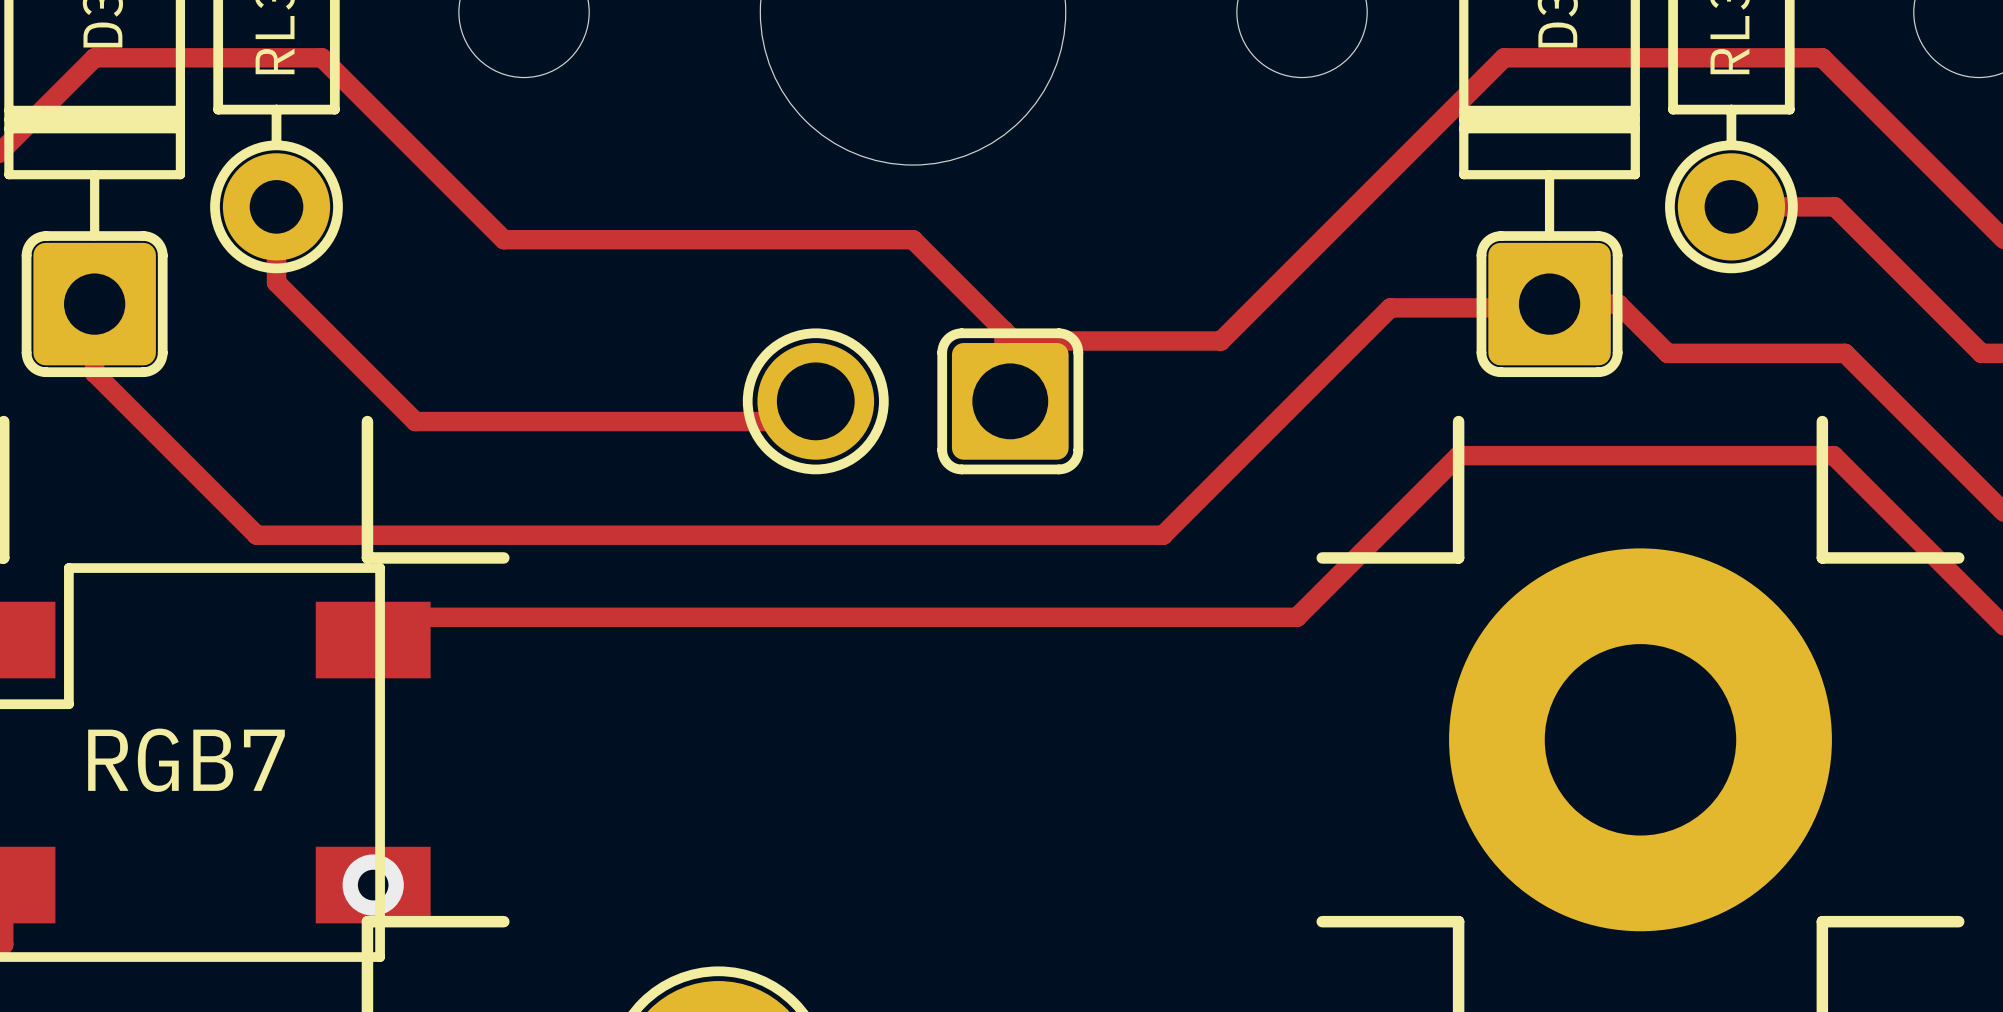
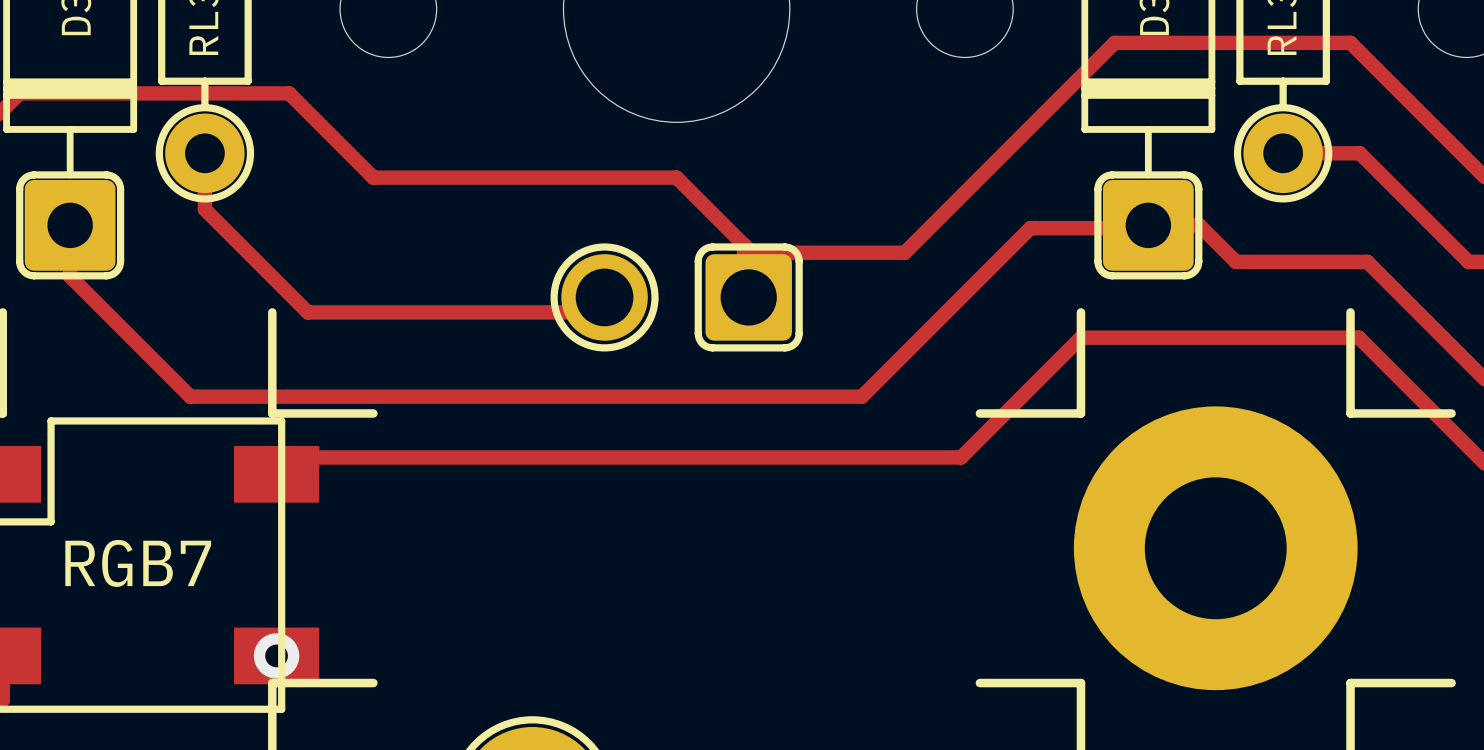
track: (26, 126) (94, 57) (321, 57) (390, 126) -> (19, 93) (289, 93)

